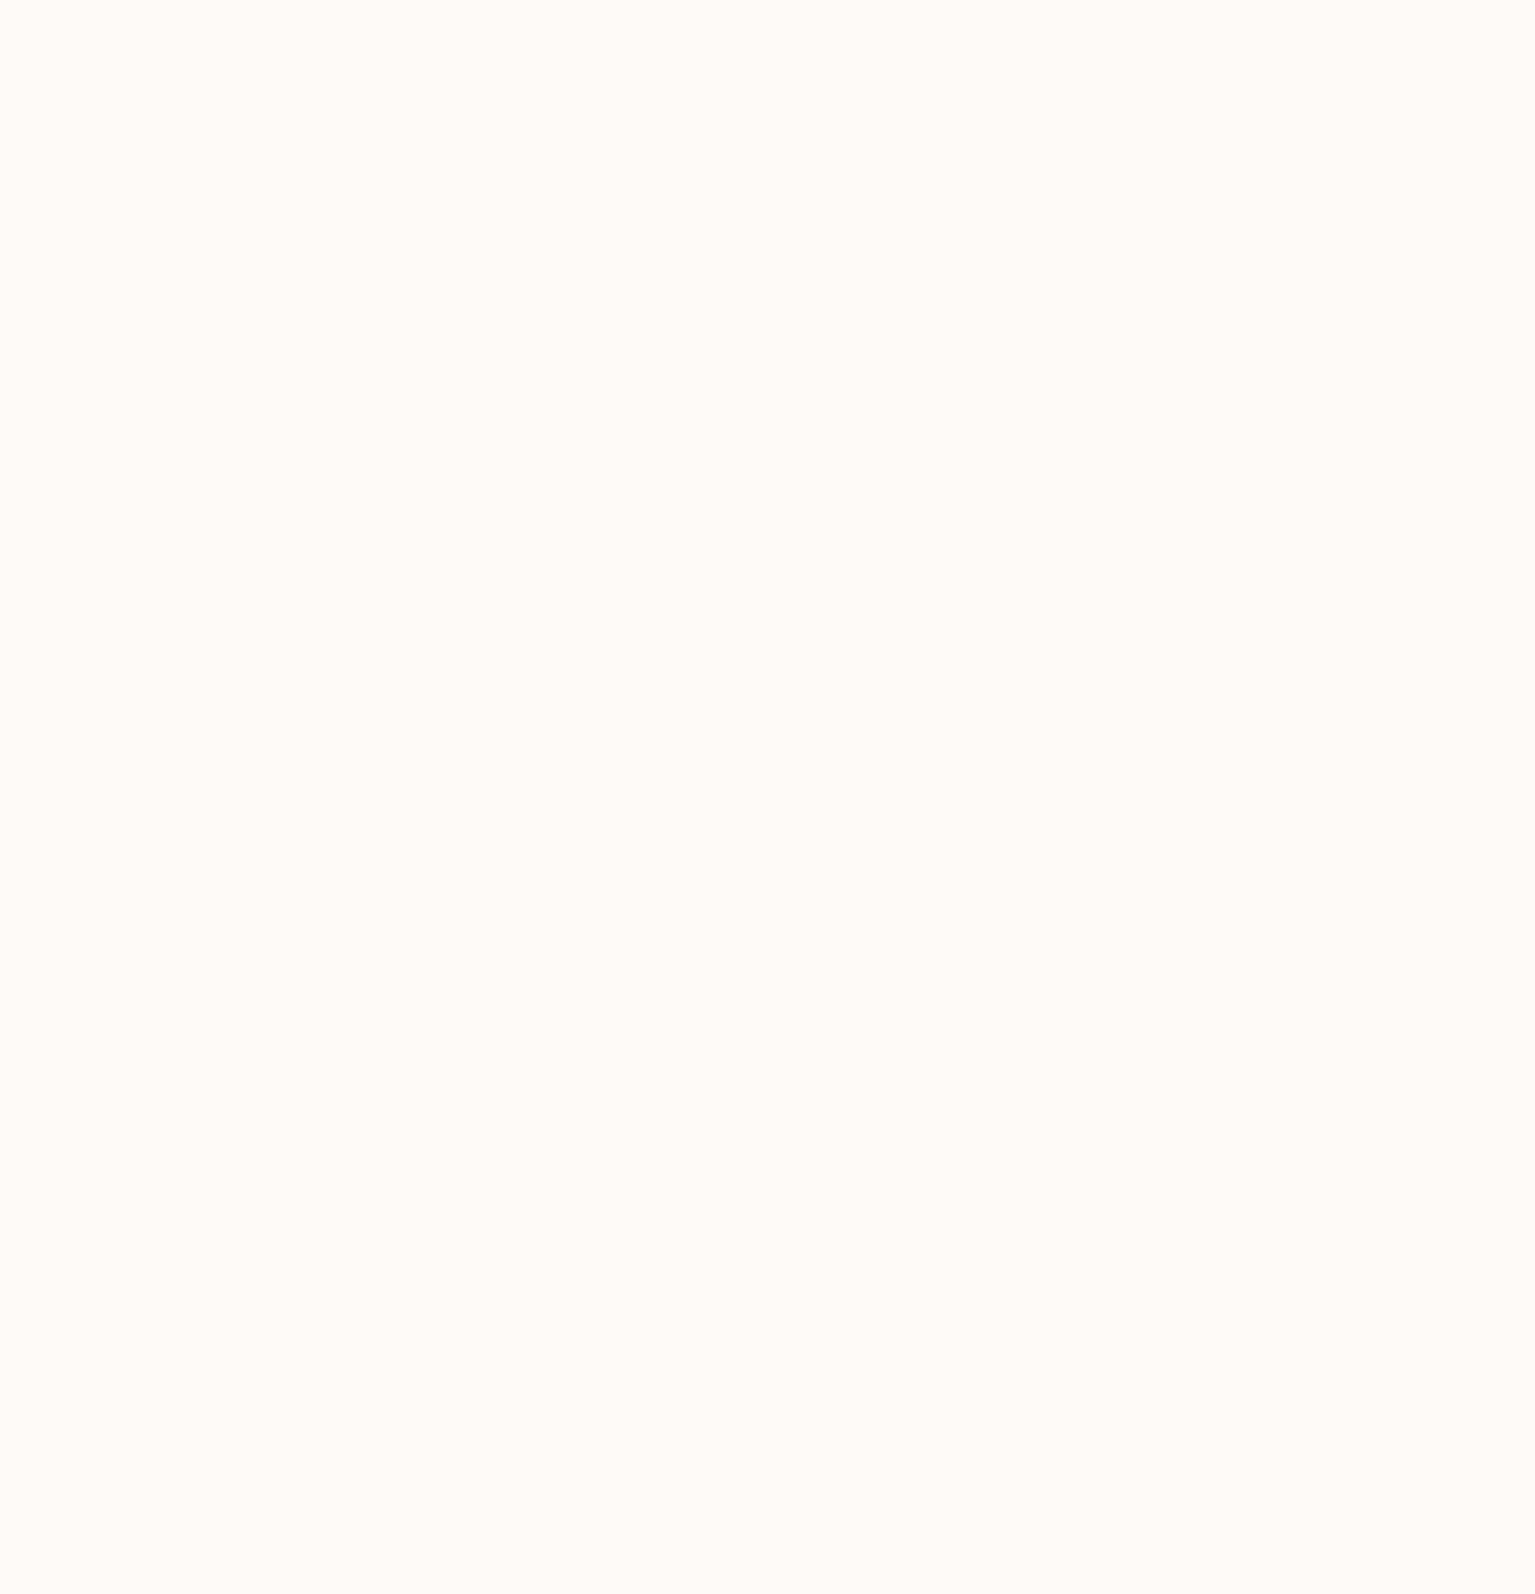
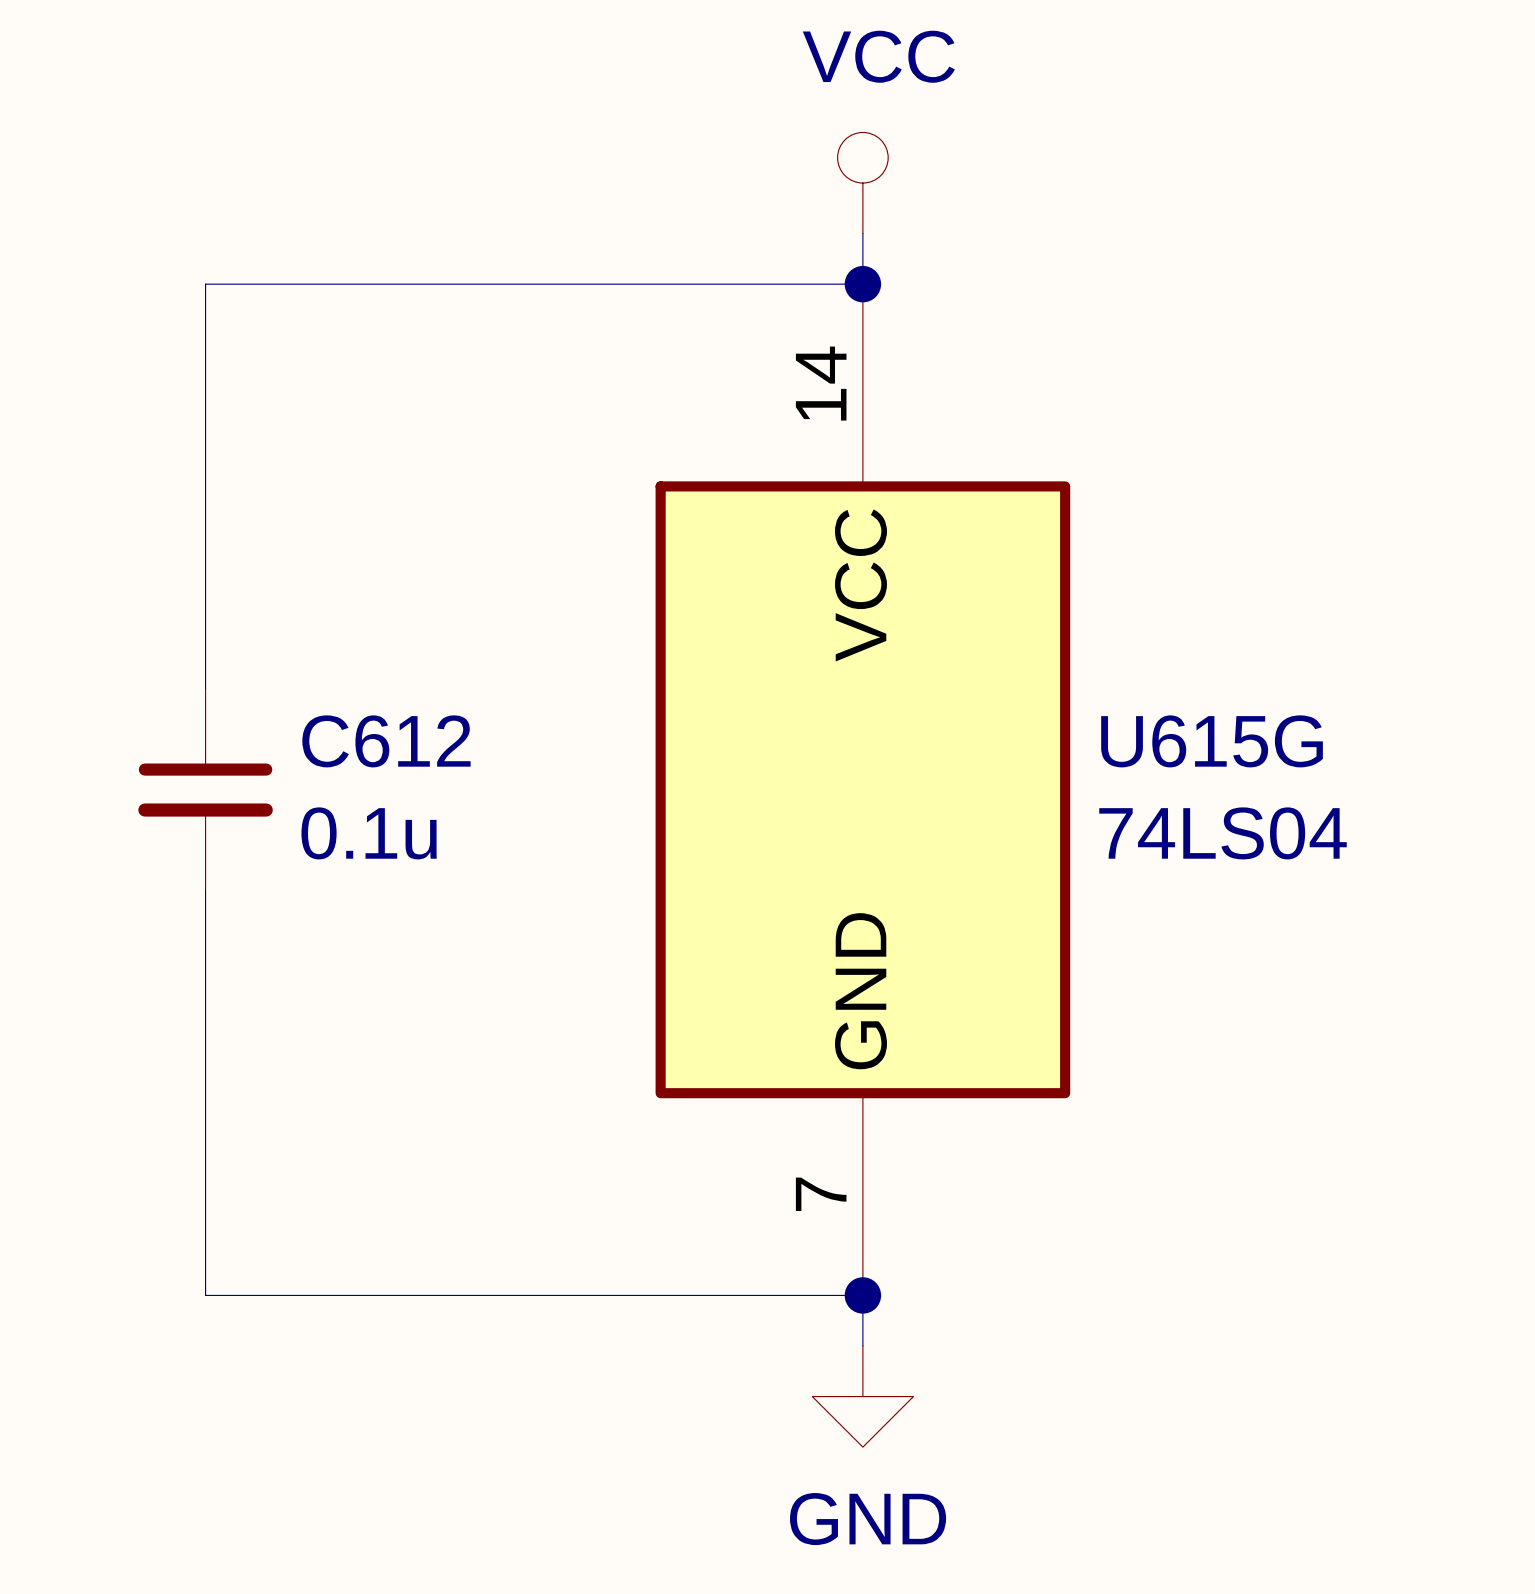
power symbol: none -> VCC (862, 183)
wire: none -> (862, 233) (862, 284) (205, 284) (205, 688)
junction: none -> (862, 284)
C612: none -> 0.1u (205, 789)
U615G: none -> 74LS04 (862, 789)
wire: none -> (205, 890) (205, 1295) (862, 1295) (862, 1346)
junction: none -> (862, 1295)
power symbol: none -> GND (862, 1396)

